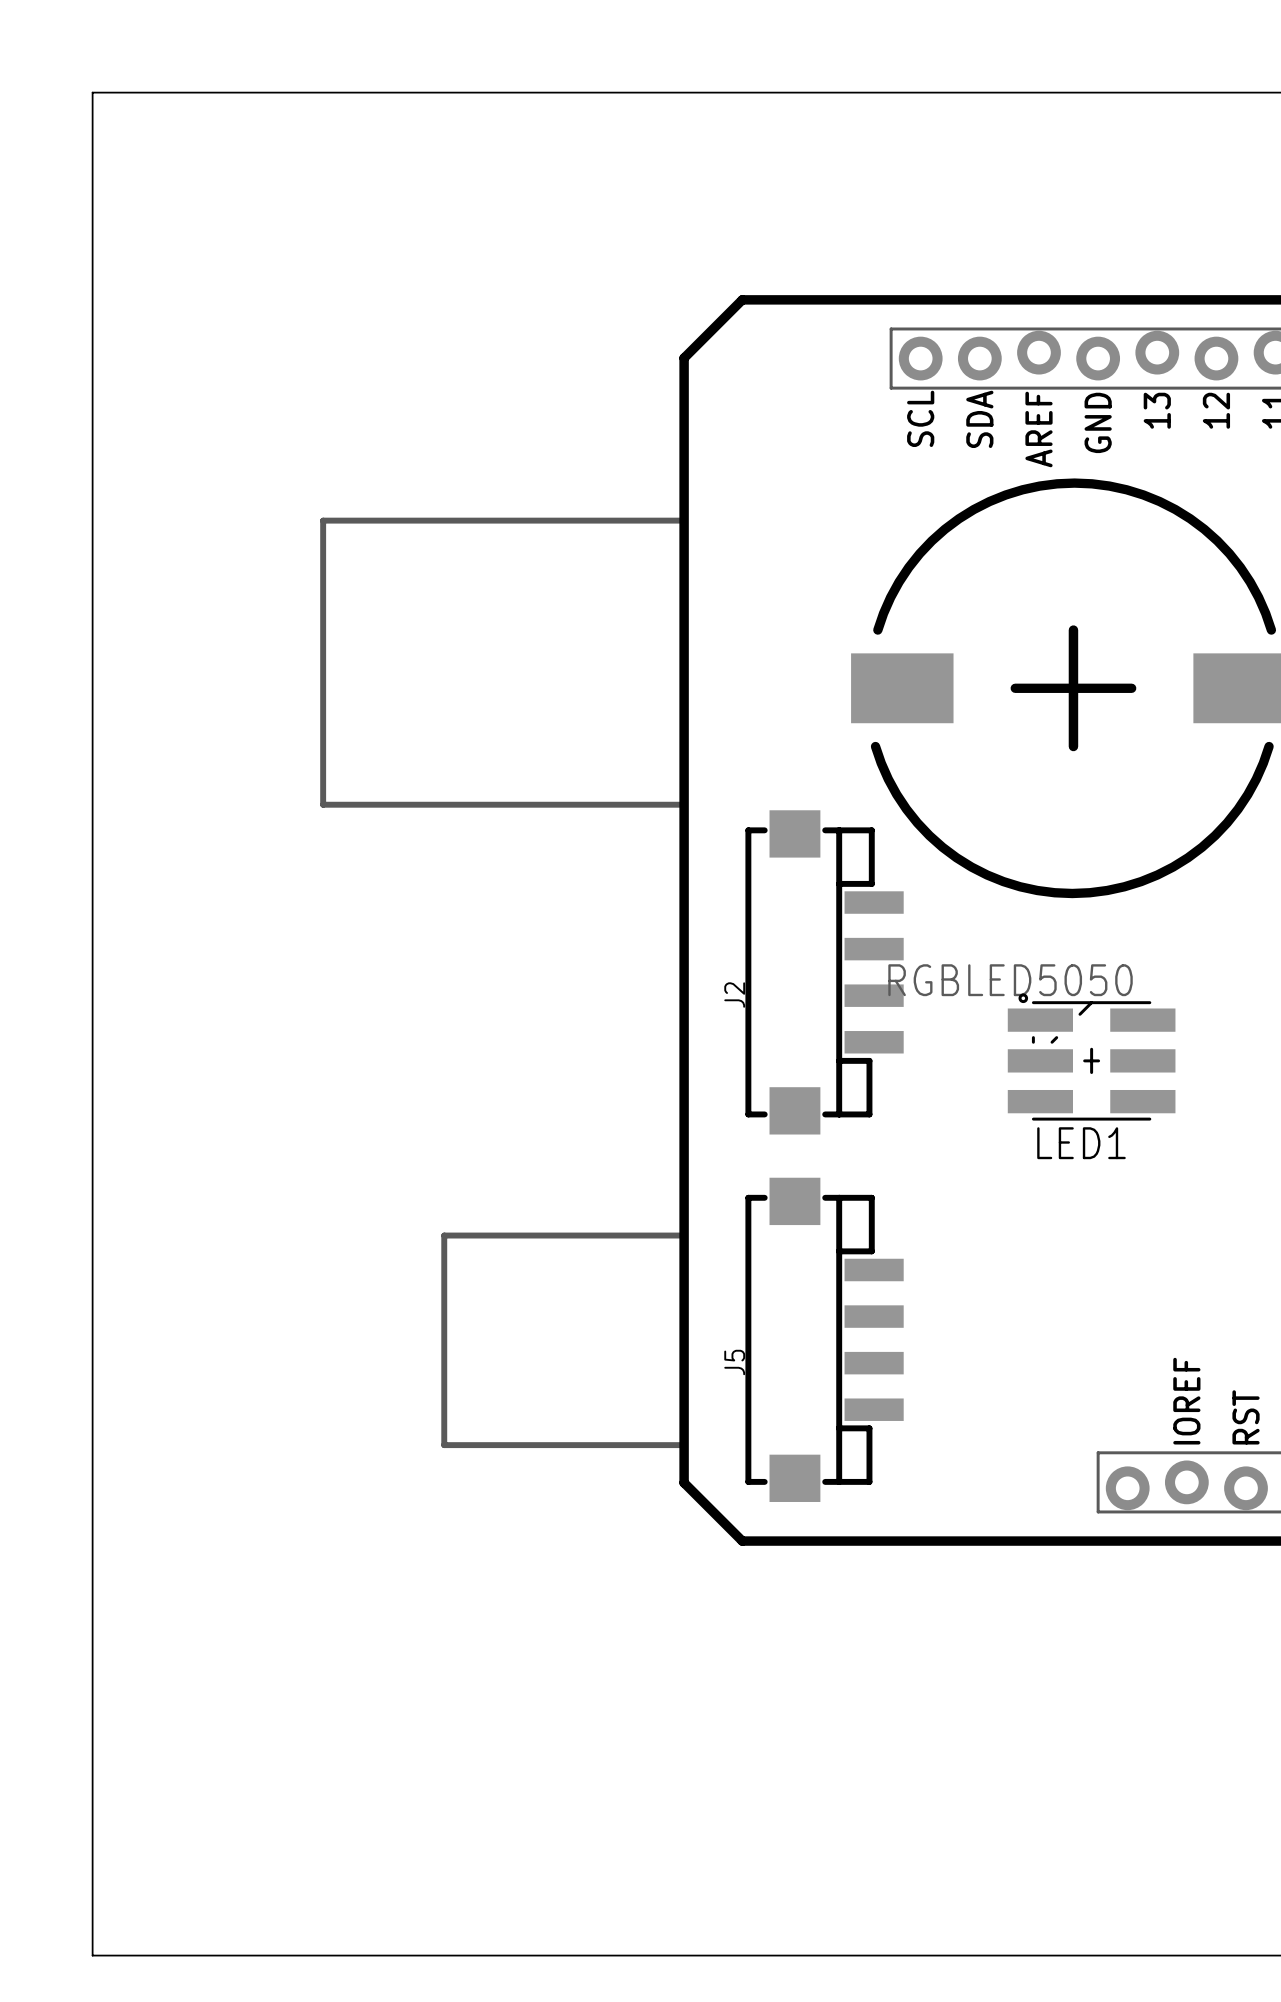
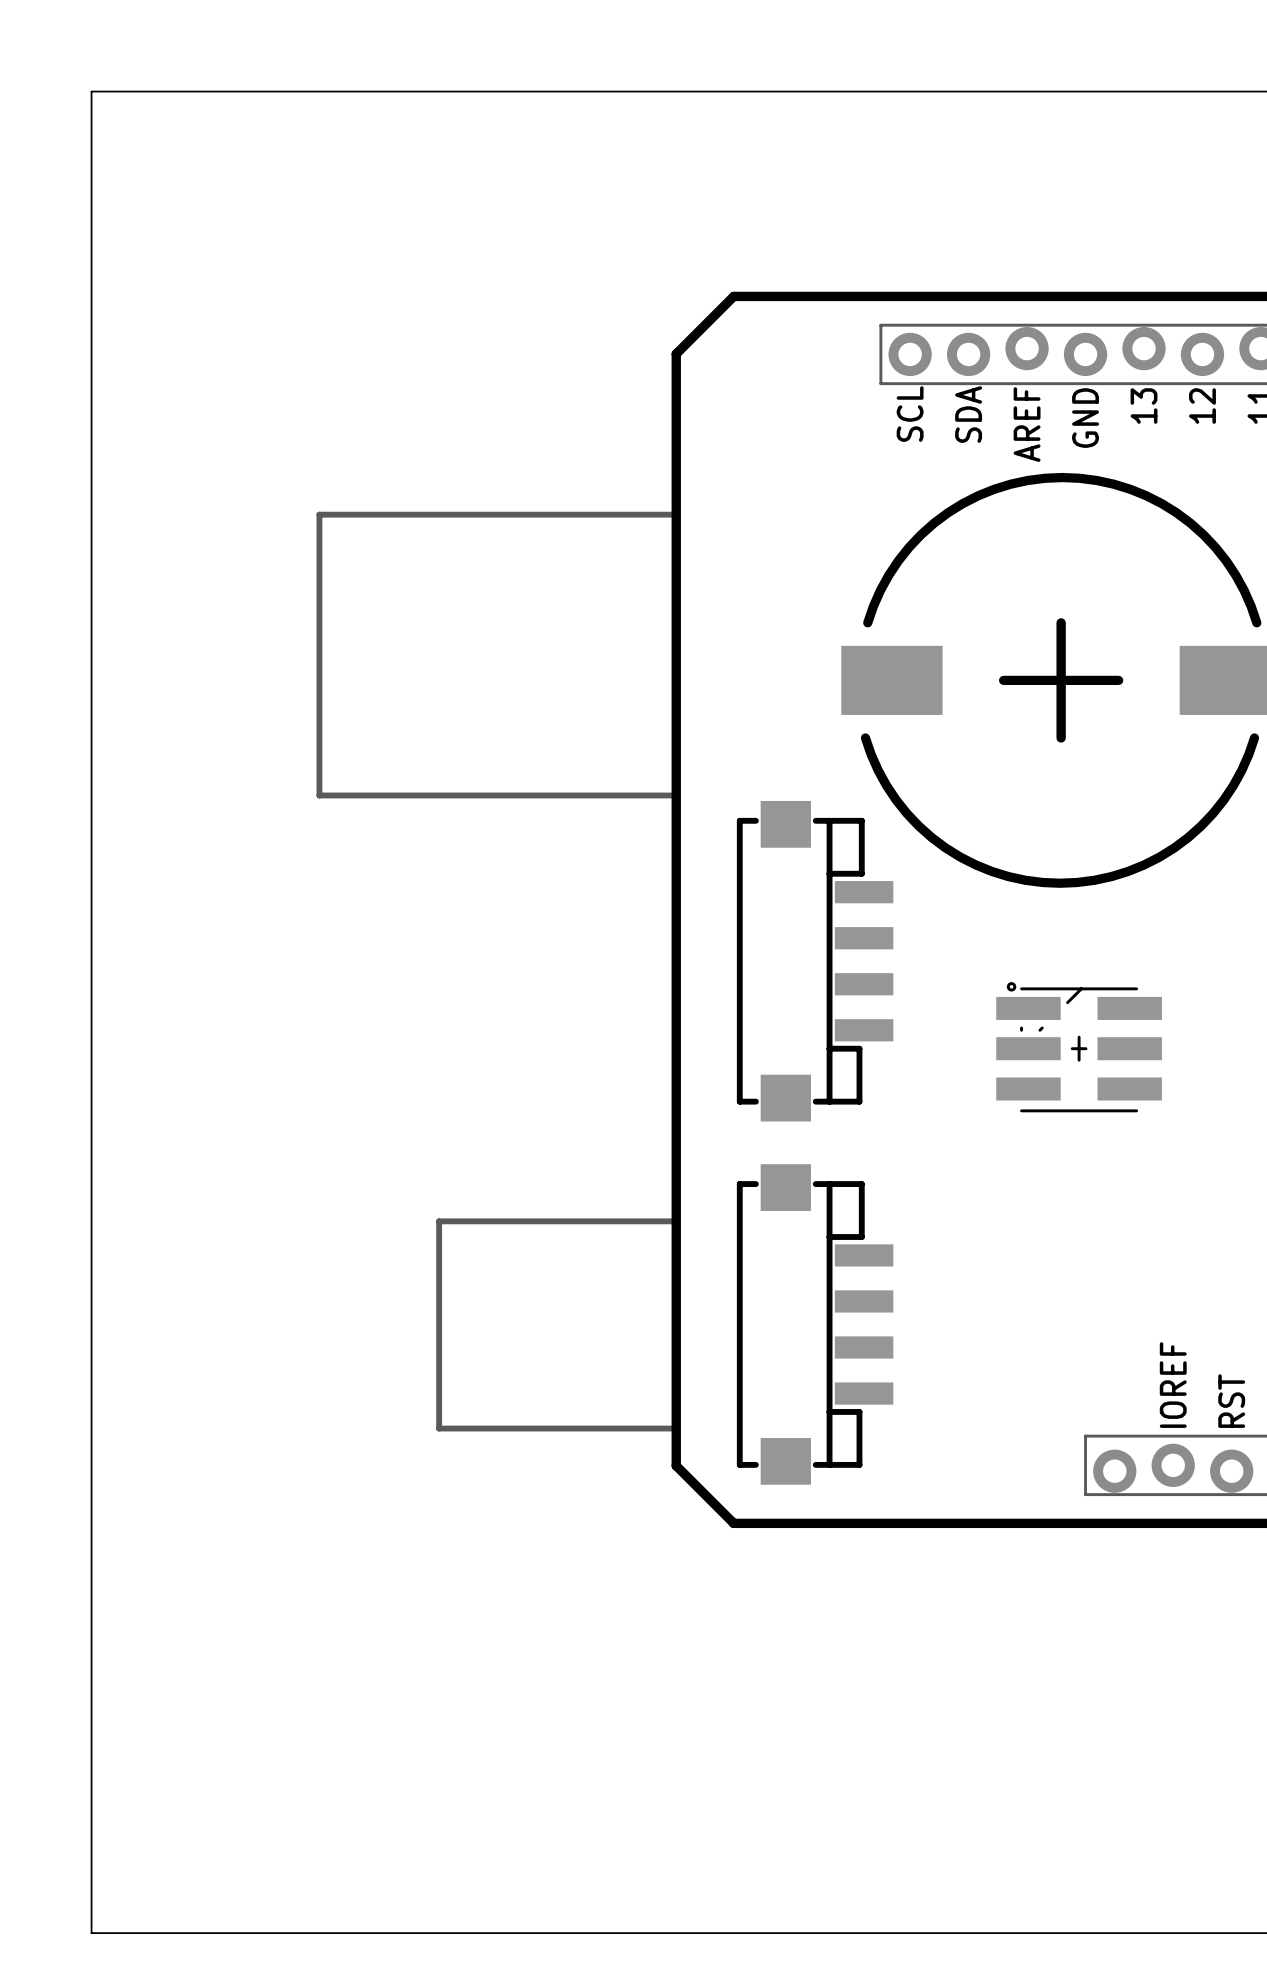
J2 name: J2 (734, 995) -> none
LED1: RGBLED5050 (1091, 1057) -> none
part: none -> (1079, 1047)
J5 name: J5 (734, 1362) -> none

